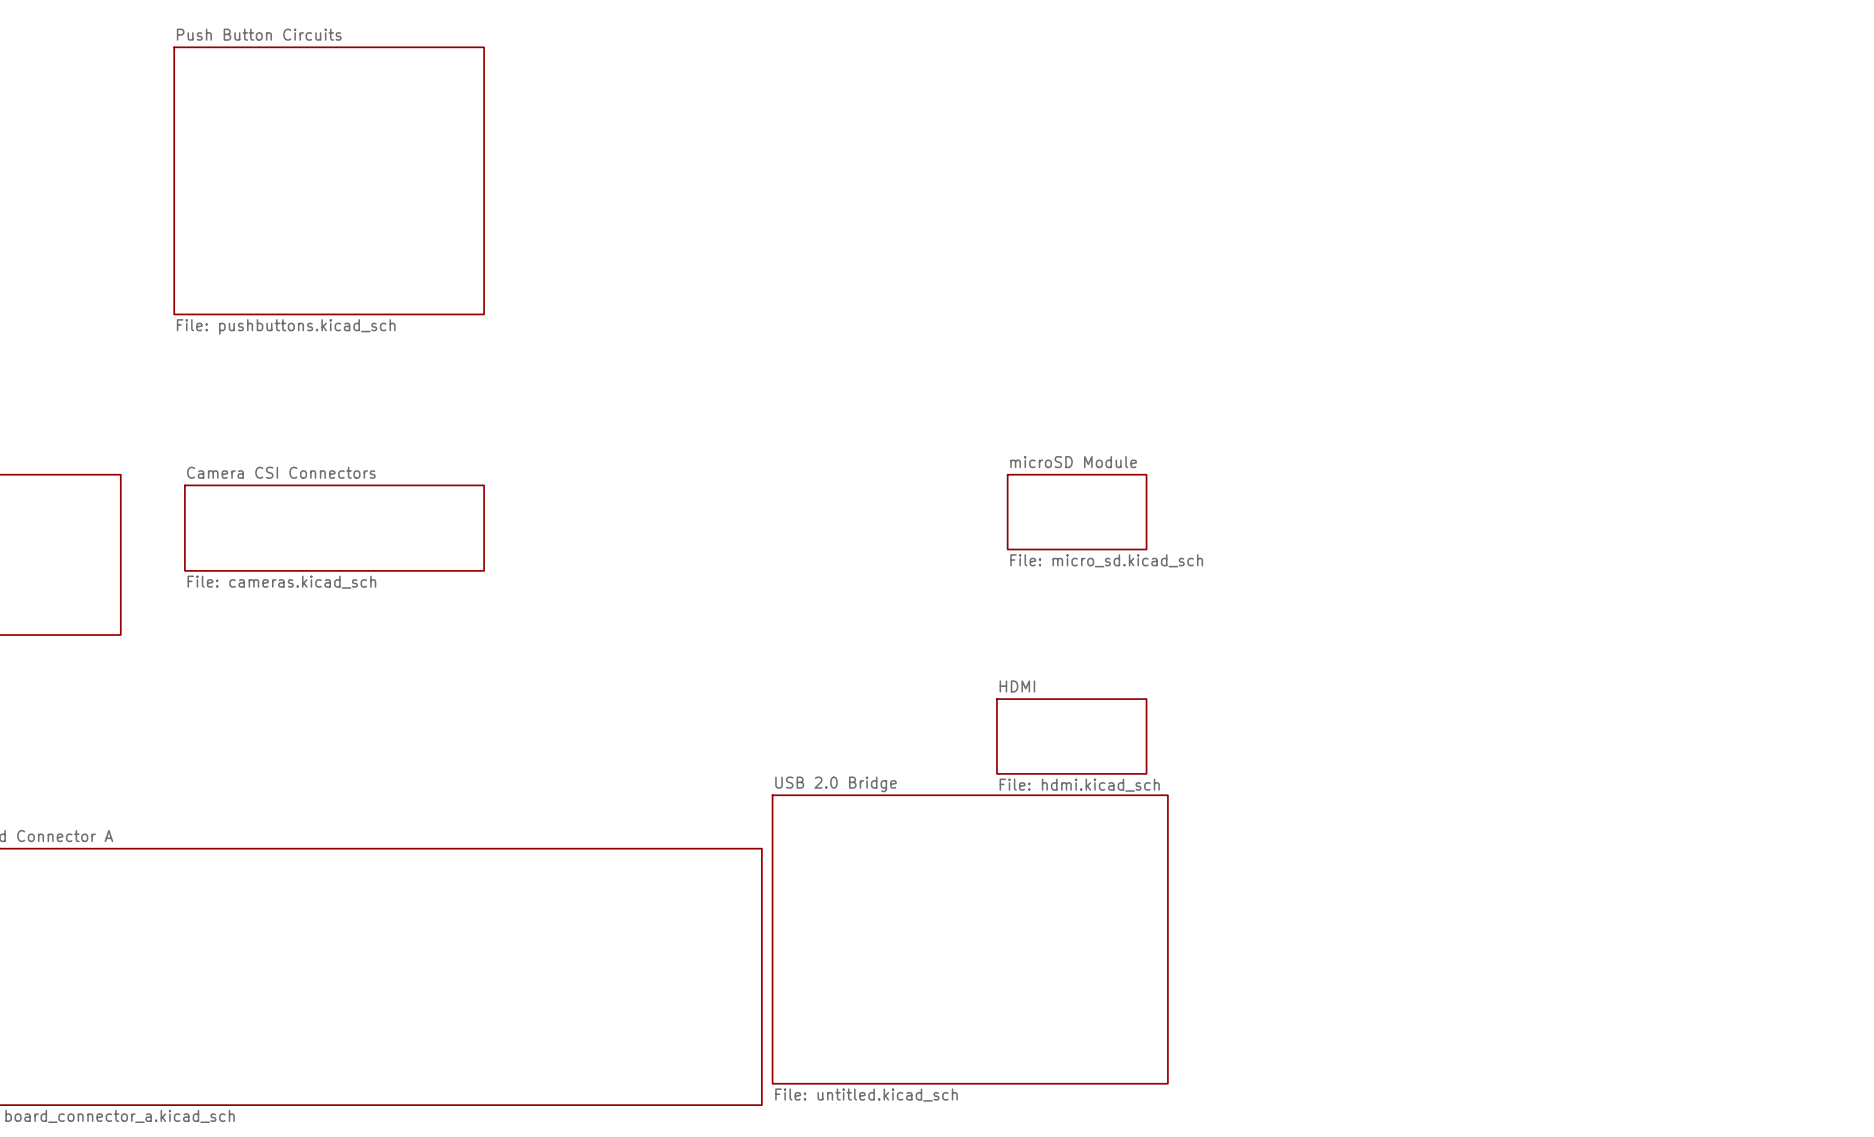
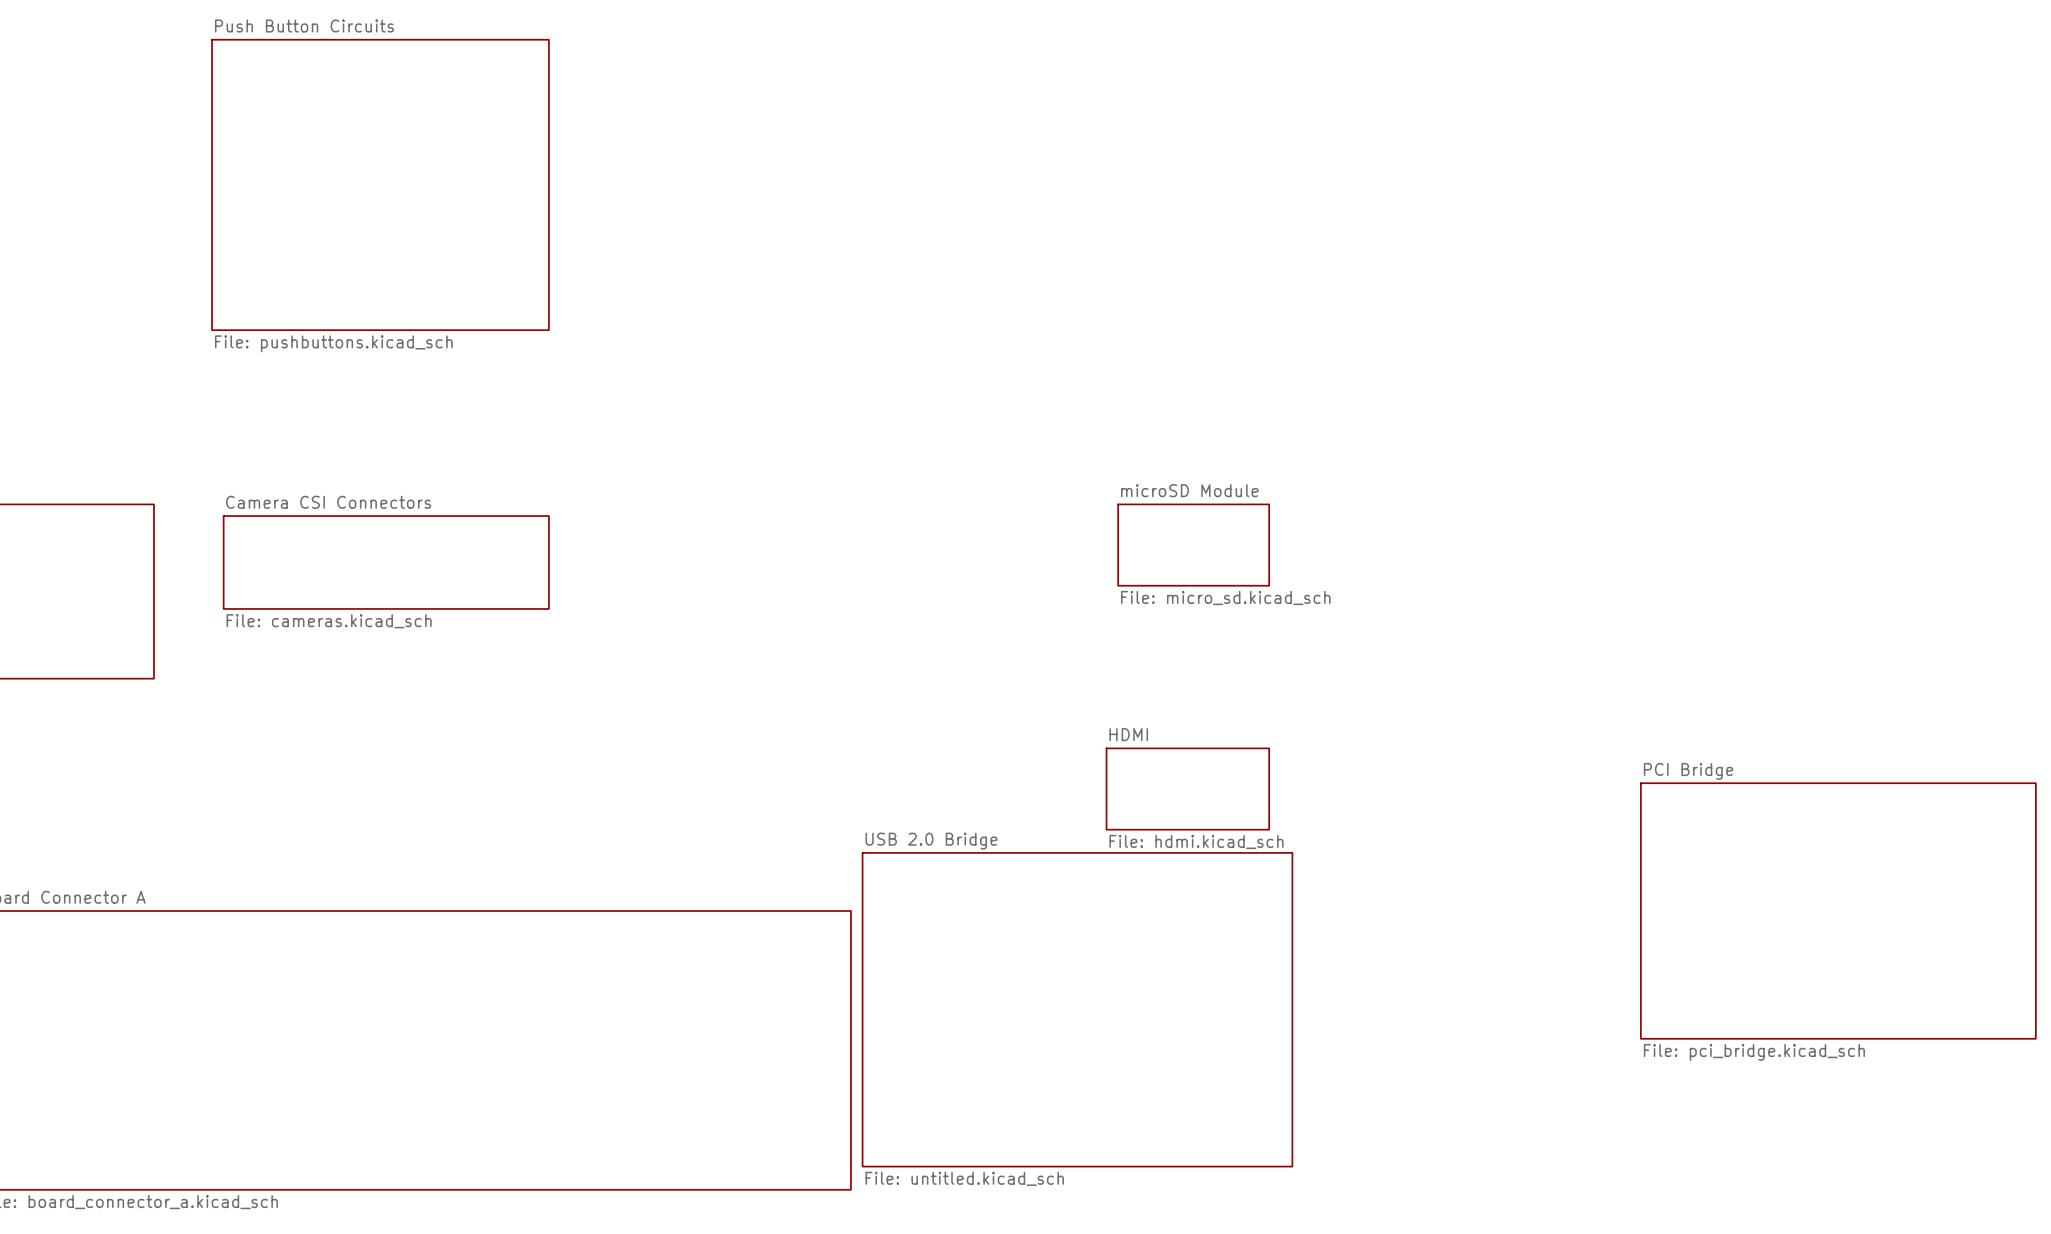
sheet PCI Bridge: none -> File: pci_bridge.kicad_sch (1838, 911)

